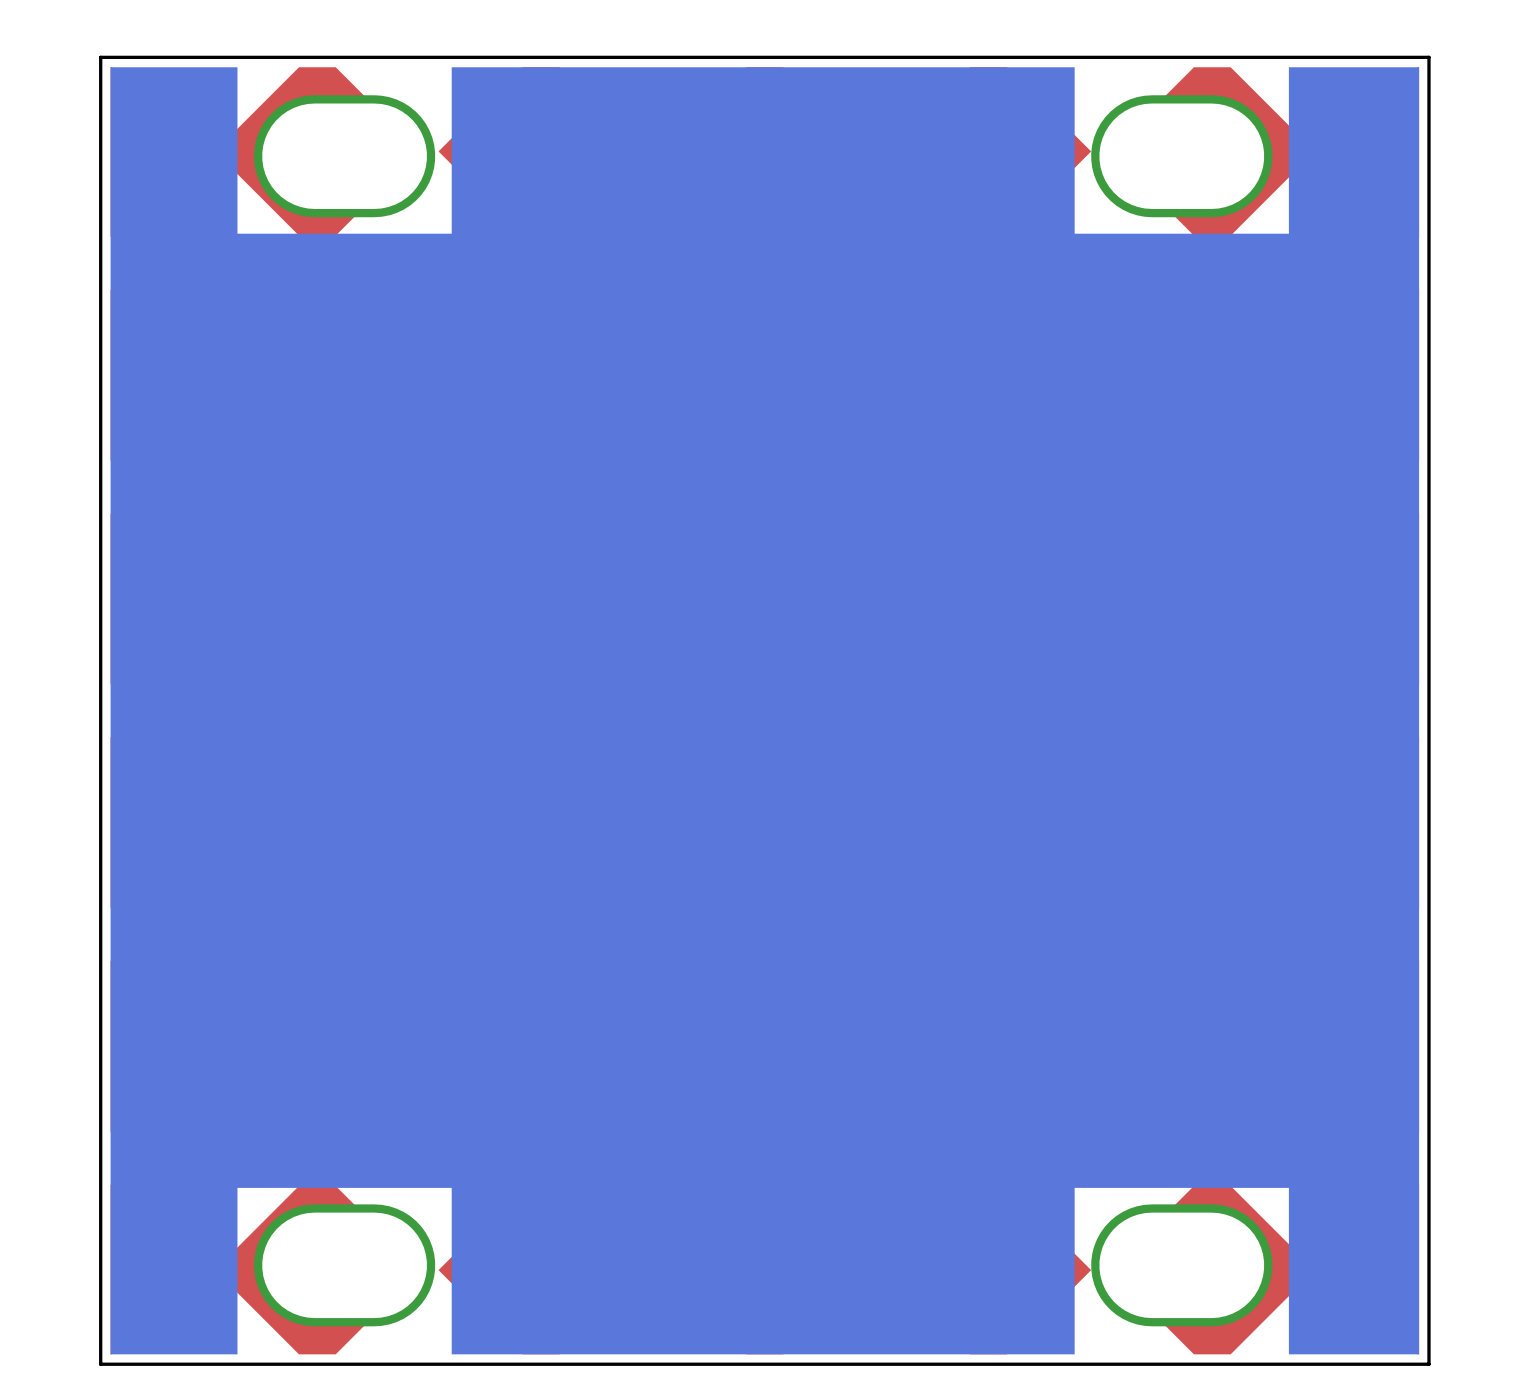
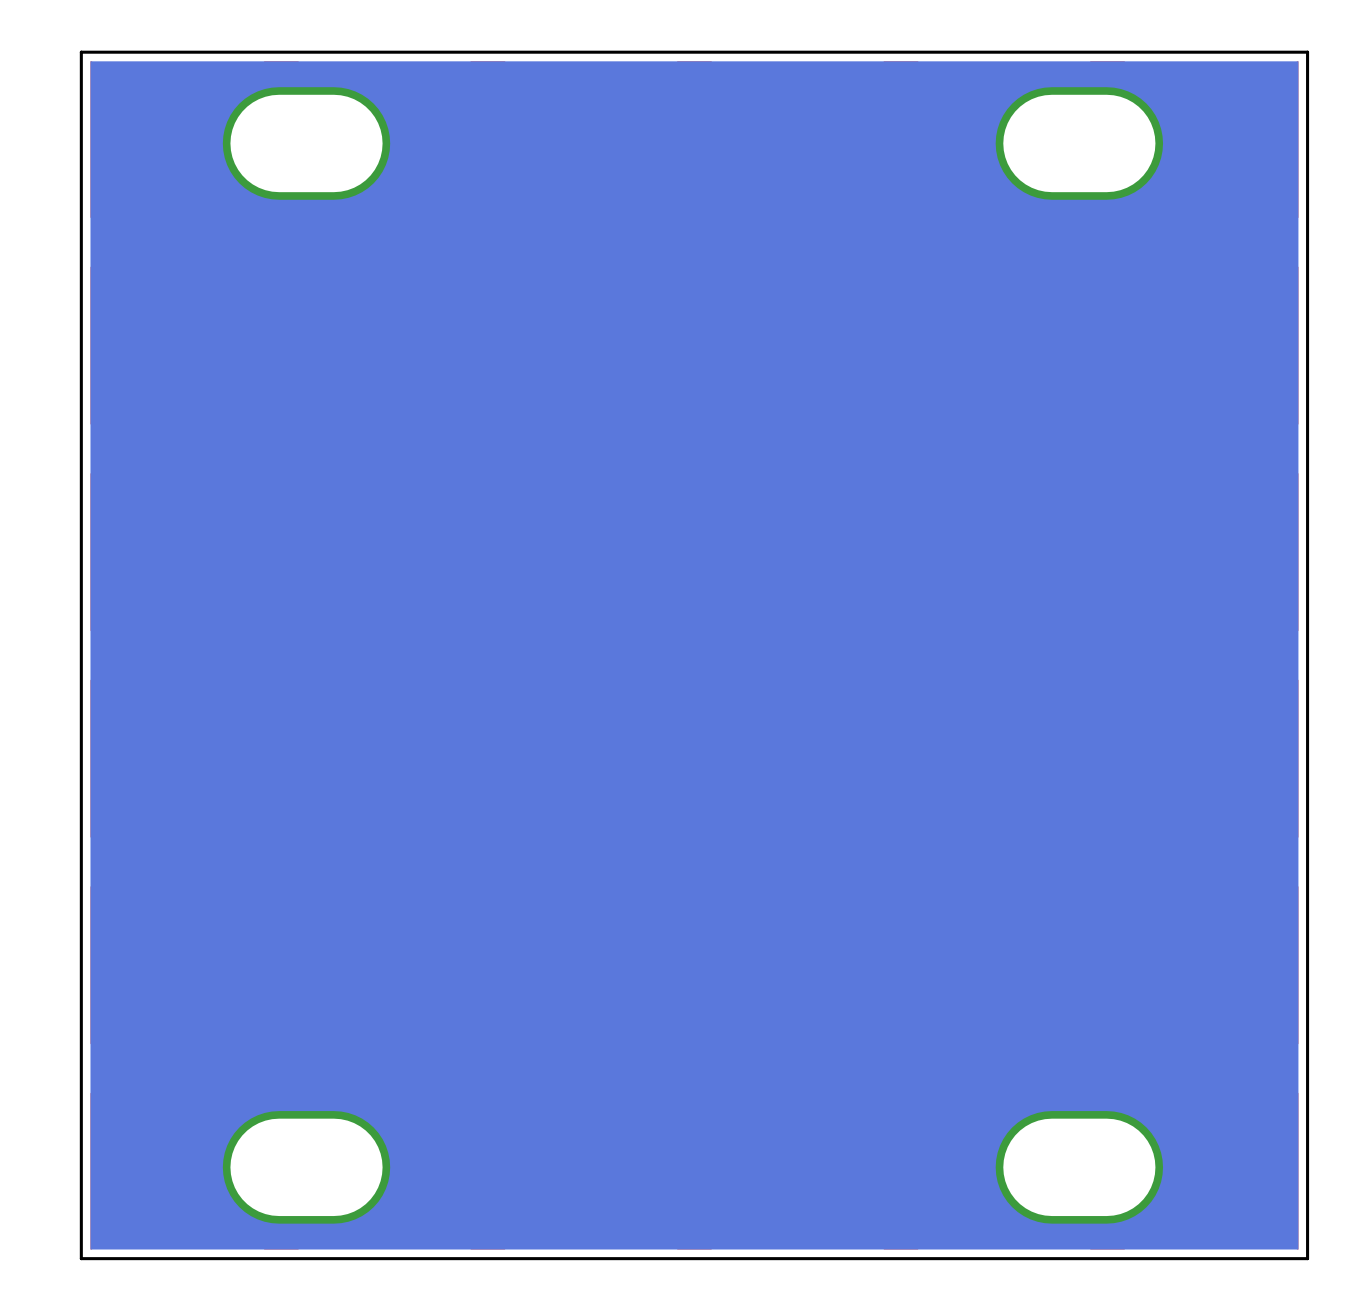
drawing: [110, 67, 238, 1355] -> none
drawing: [451, 67, 1075, 234] -> none
drawing: [1288, 67, 1420, 1355] -> none
drawing shape: [237, 233, 1289, 1188] -> [90, 61, 1299, 1250]
drawing: [451, 1187, 1075, 1355] -> none

